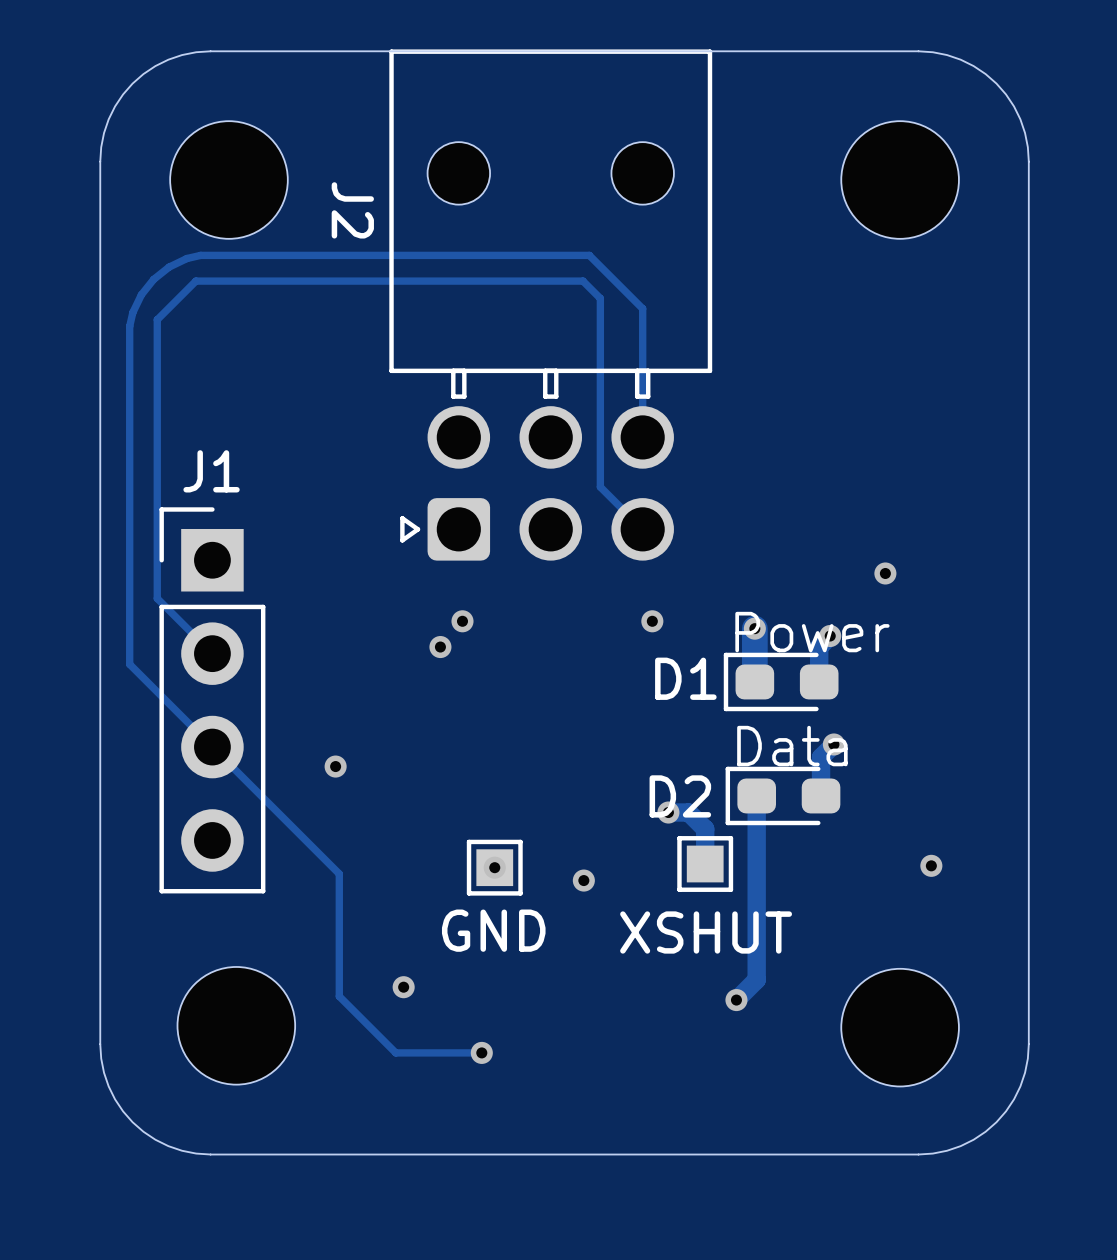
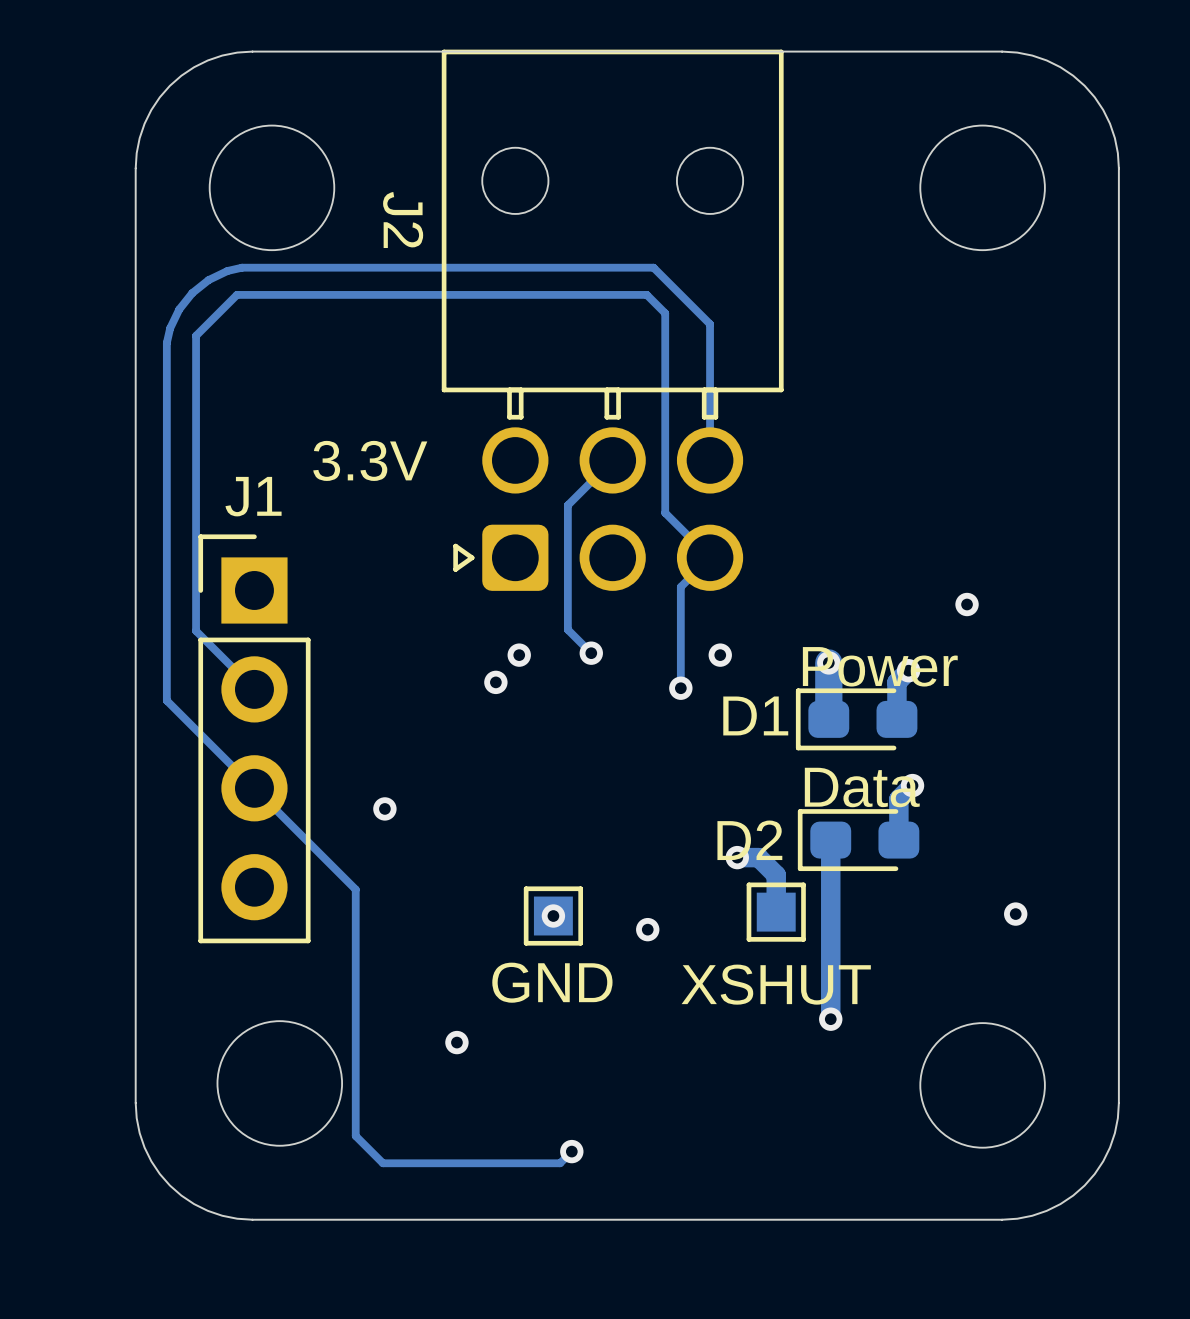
text: none -> 3.3V (370, 460)
track: none -> (612, 460) (567, 505) (567, 629) (591, 653)
track: none -> (710, 557) (680, 586) (680, 688)
via: none -> (591, 653)
via: none -> (680, 688)
track: (308, 842) (339, 873) (339, 996) (395, 1052) (481, 1052) -> (355, 889) (355, 1136) (382, 1163) (560, 1163) (571, 1151)
track: (756, 965) (756, 979) (736, 1000) -> none
via position: (736, 1000) -> (830, 1019)
via position: (481, 1052) -> (571, 1151)

